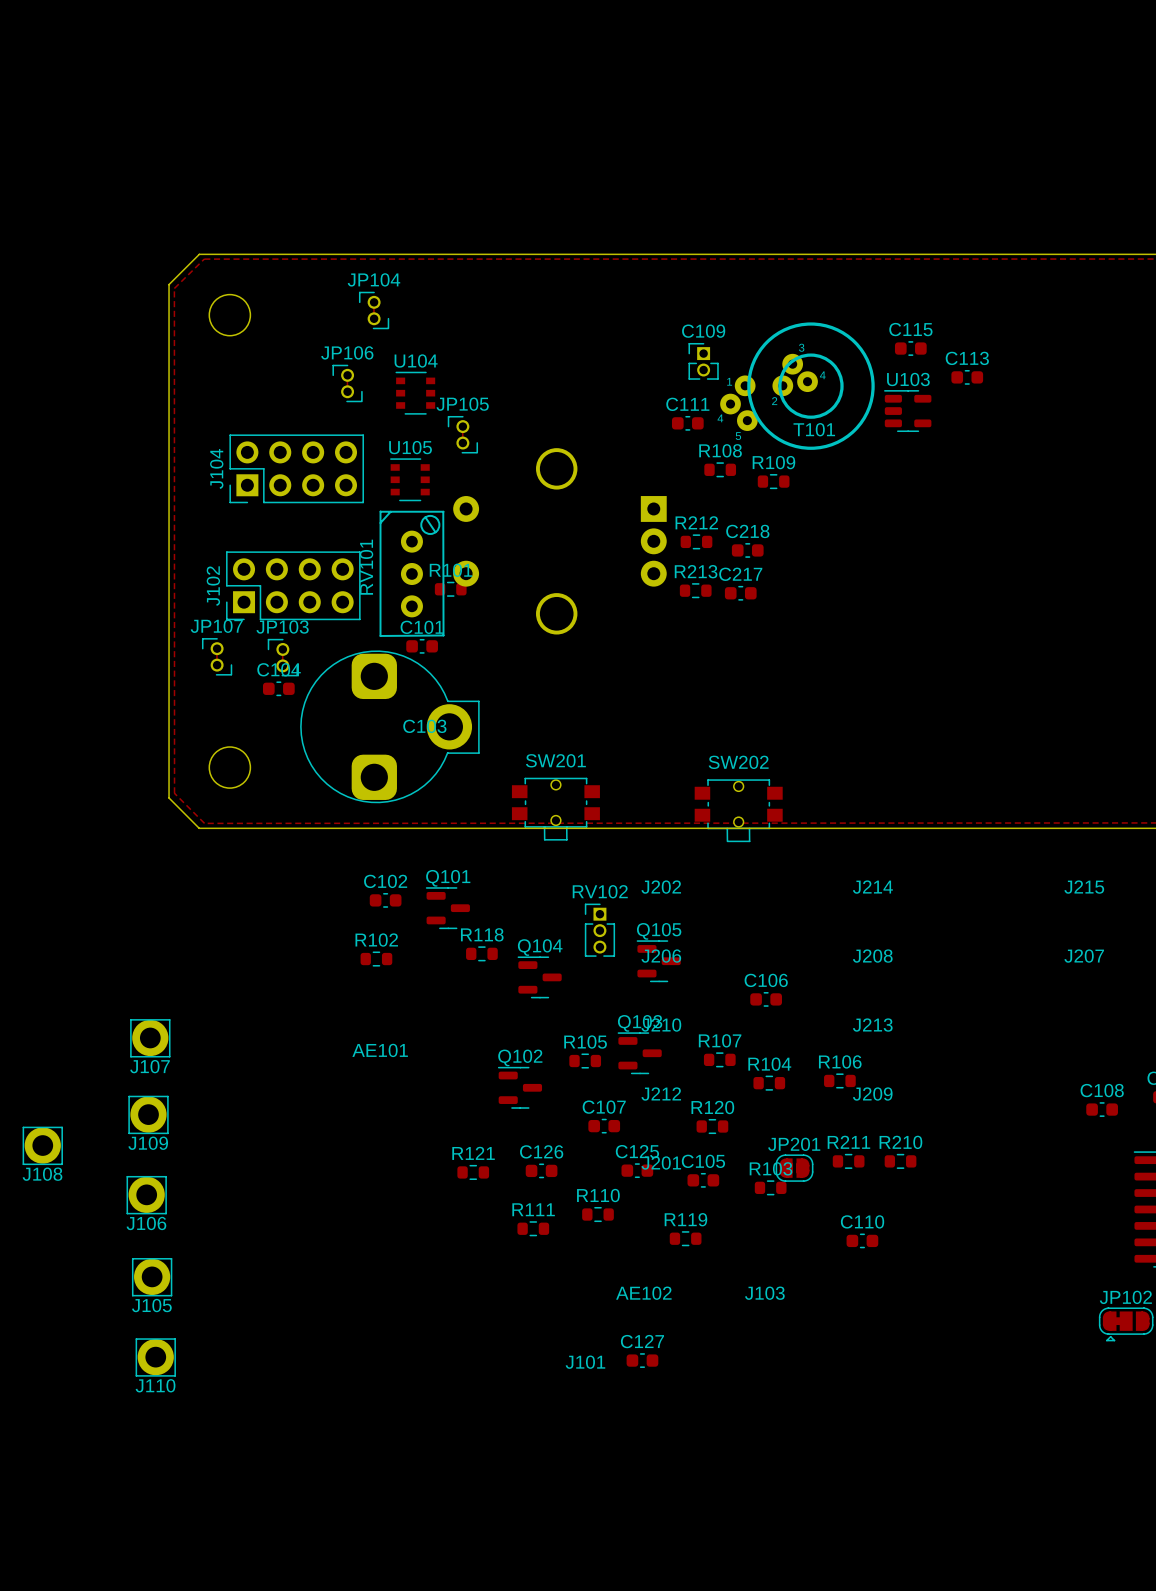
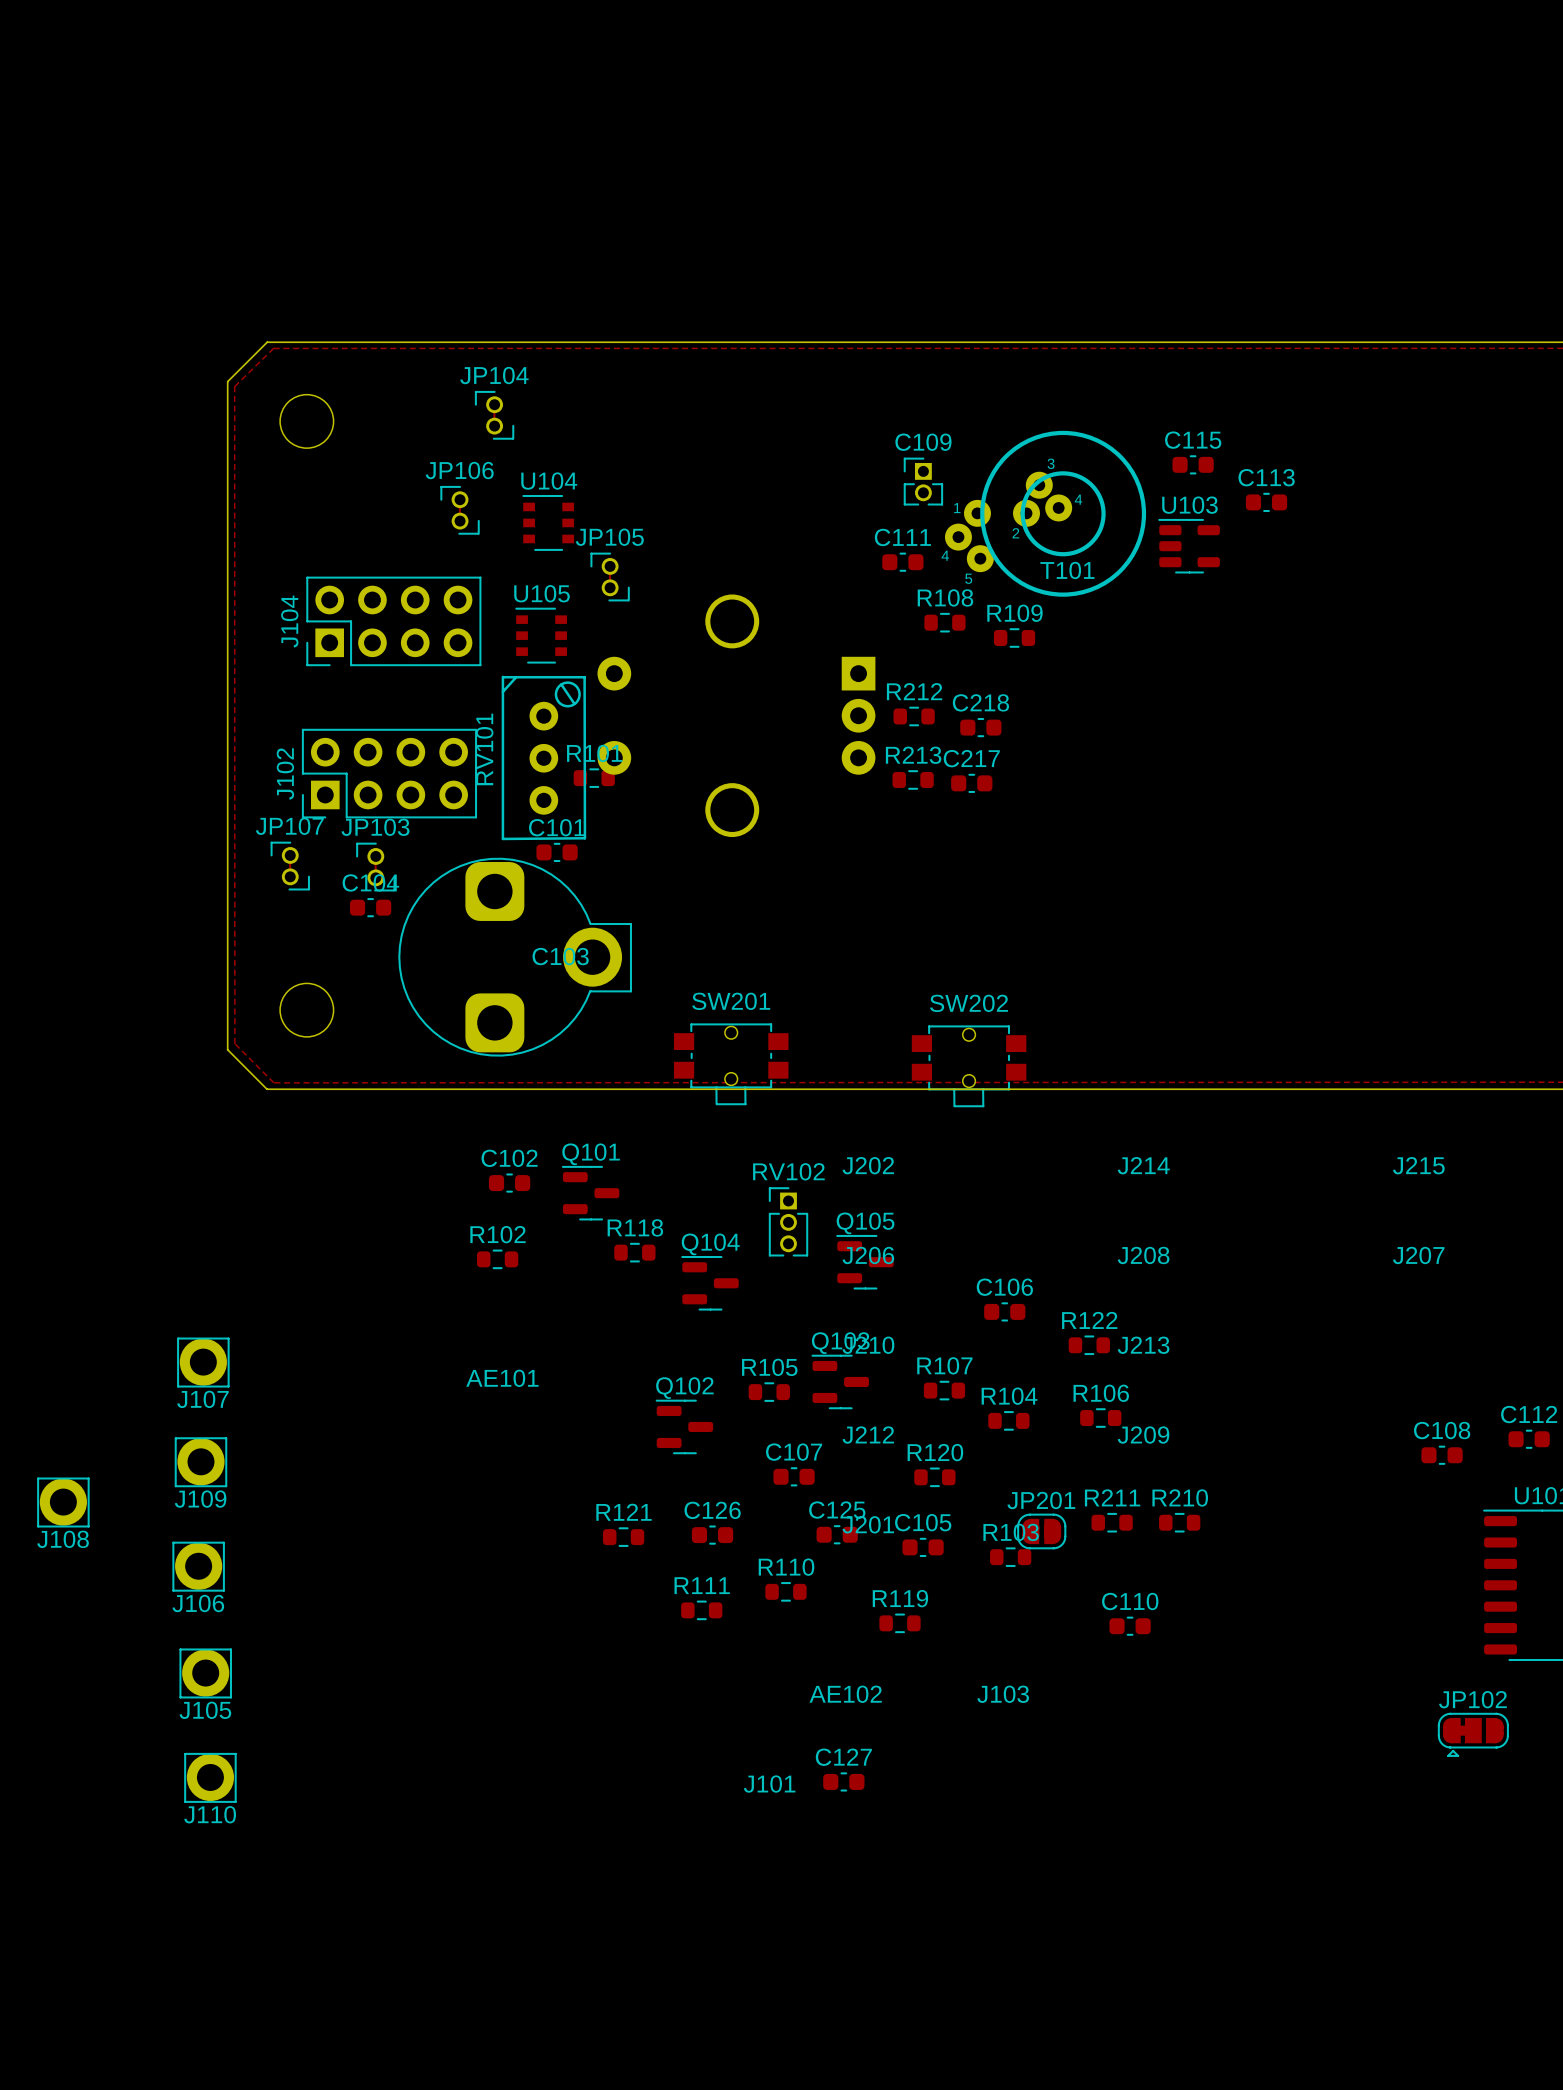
R122: none -> (1089, 1345)

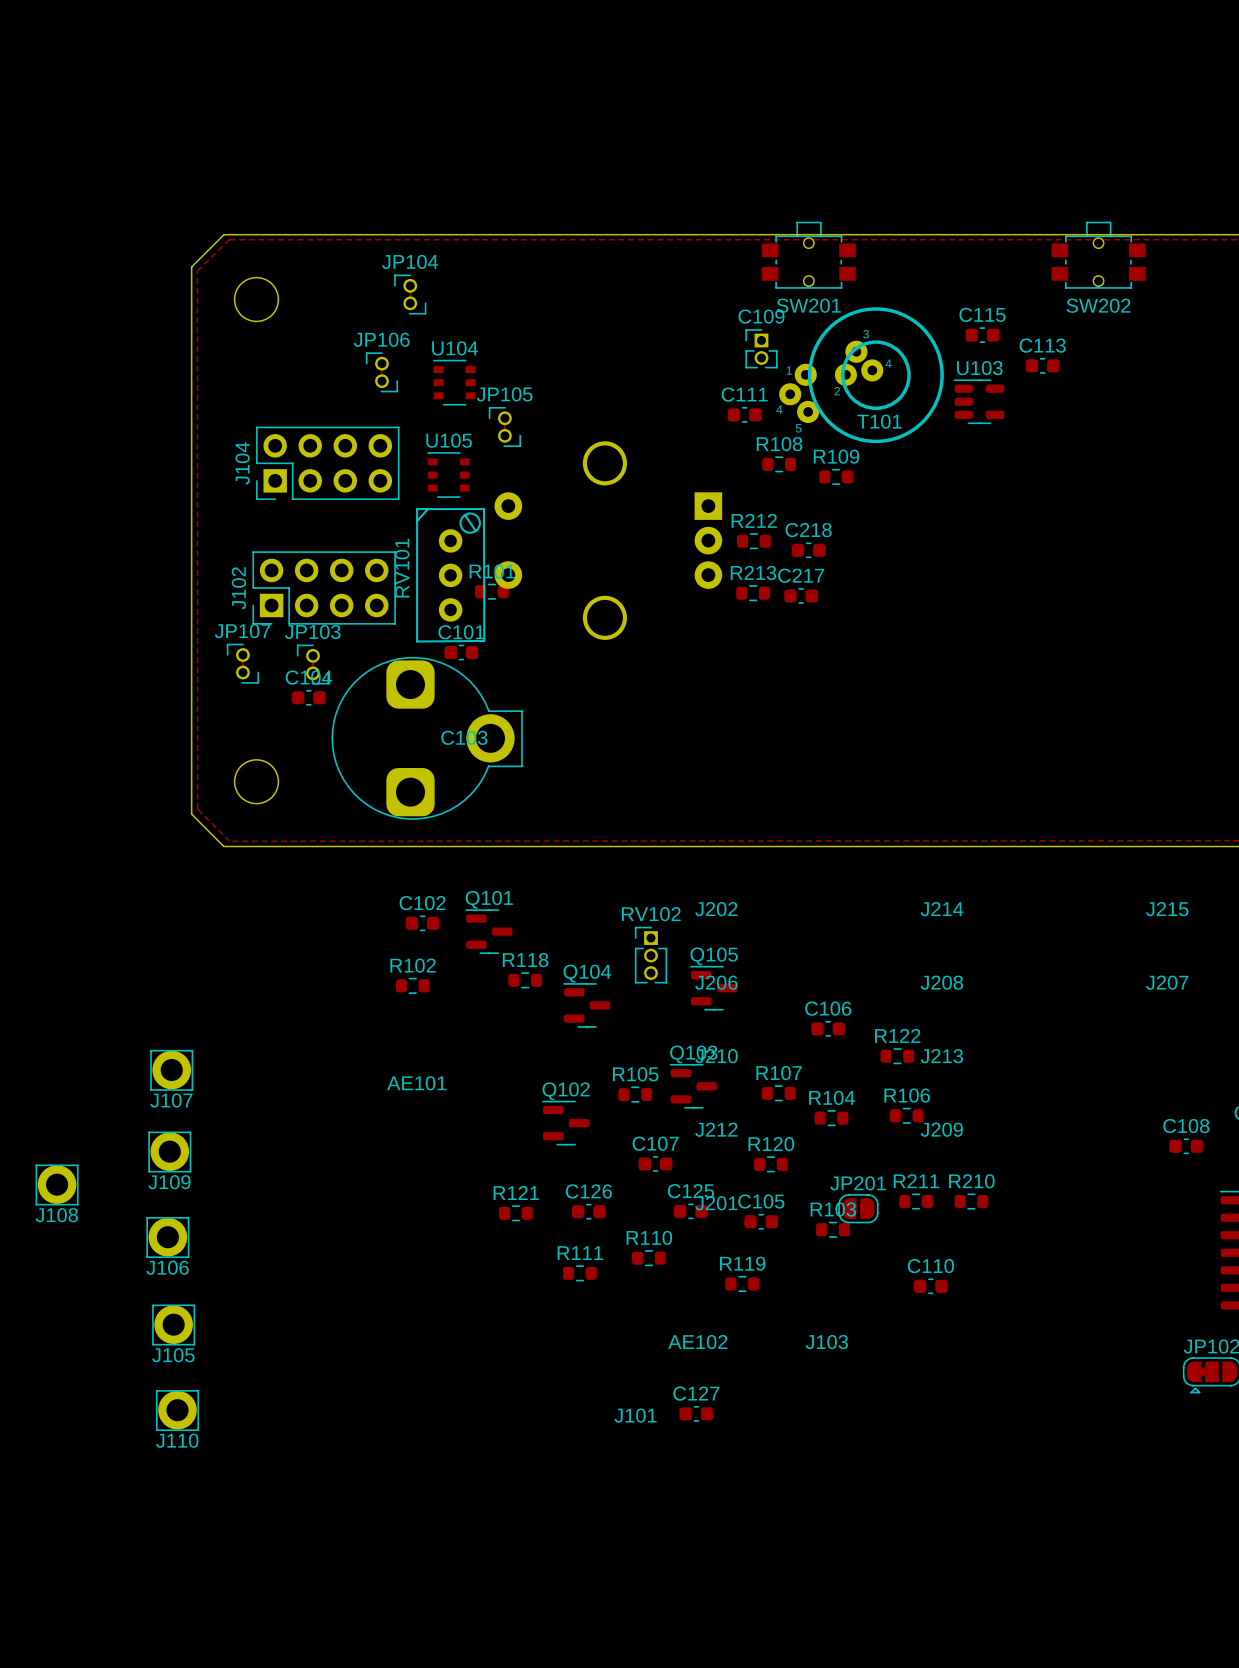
SW201 rotation: 0° (731, 1064) -> 180° (808, 255)
SW201 position: (731, 1064) -> (808, 255)
SW202 rotation: 0° (969, 1066) -> 180° (1098, 255)
SW202 position: (969, 1066) -> (1098, 255)

